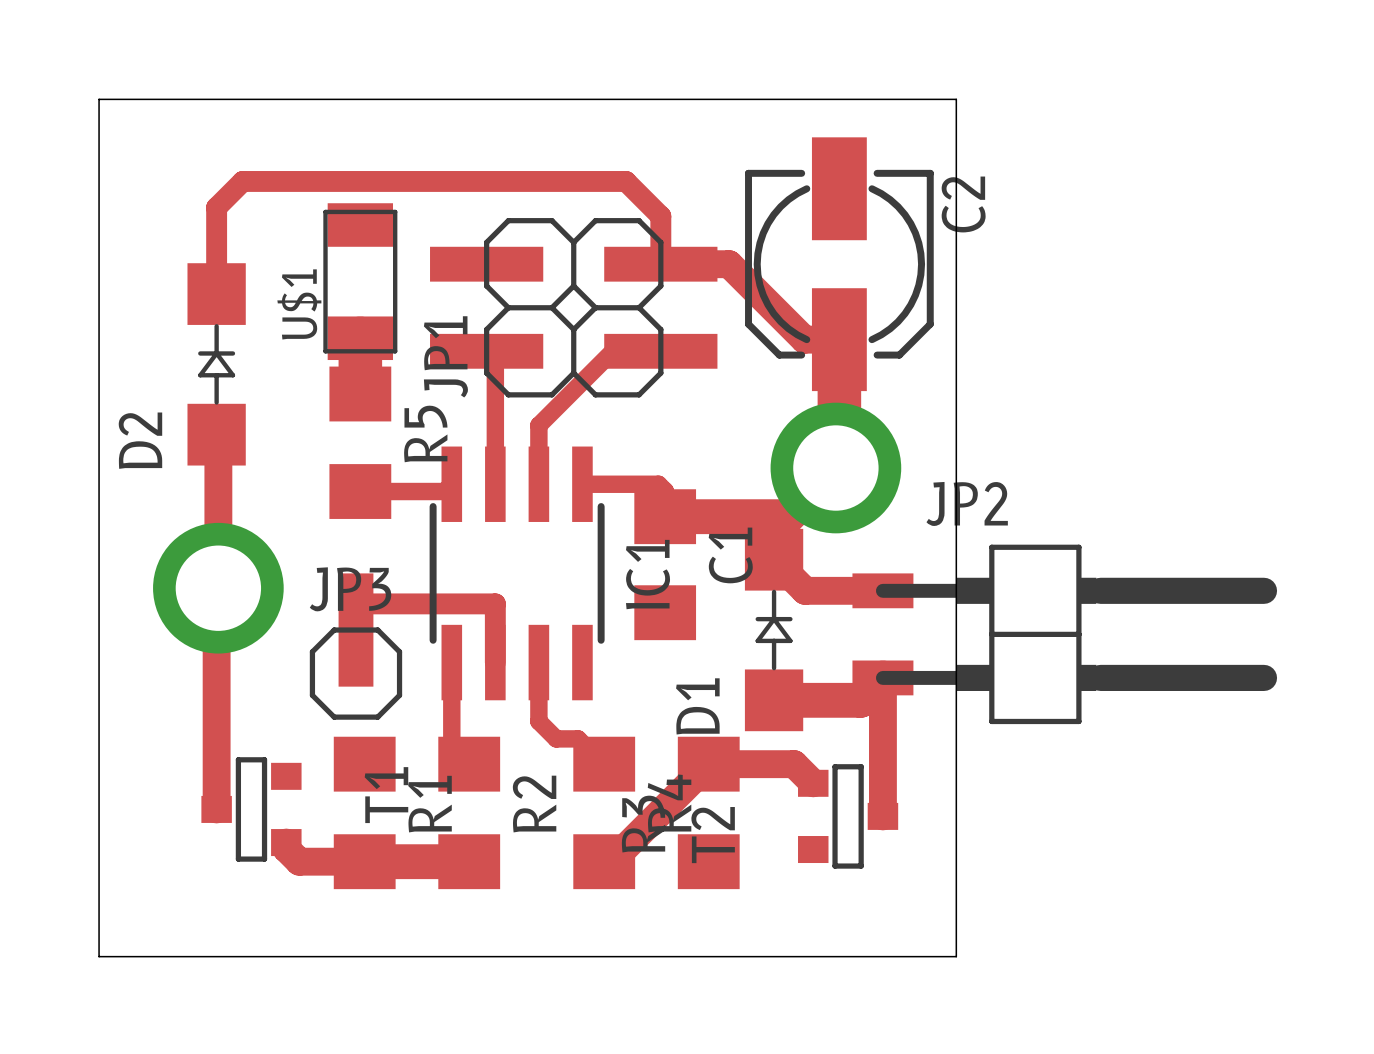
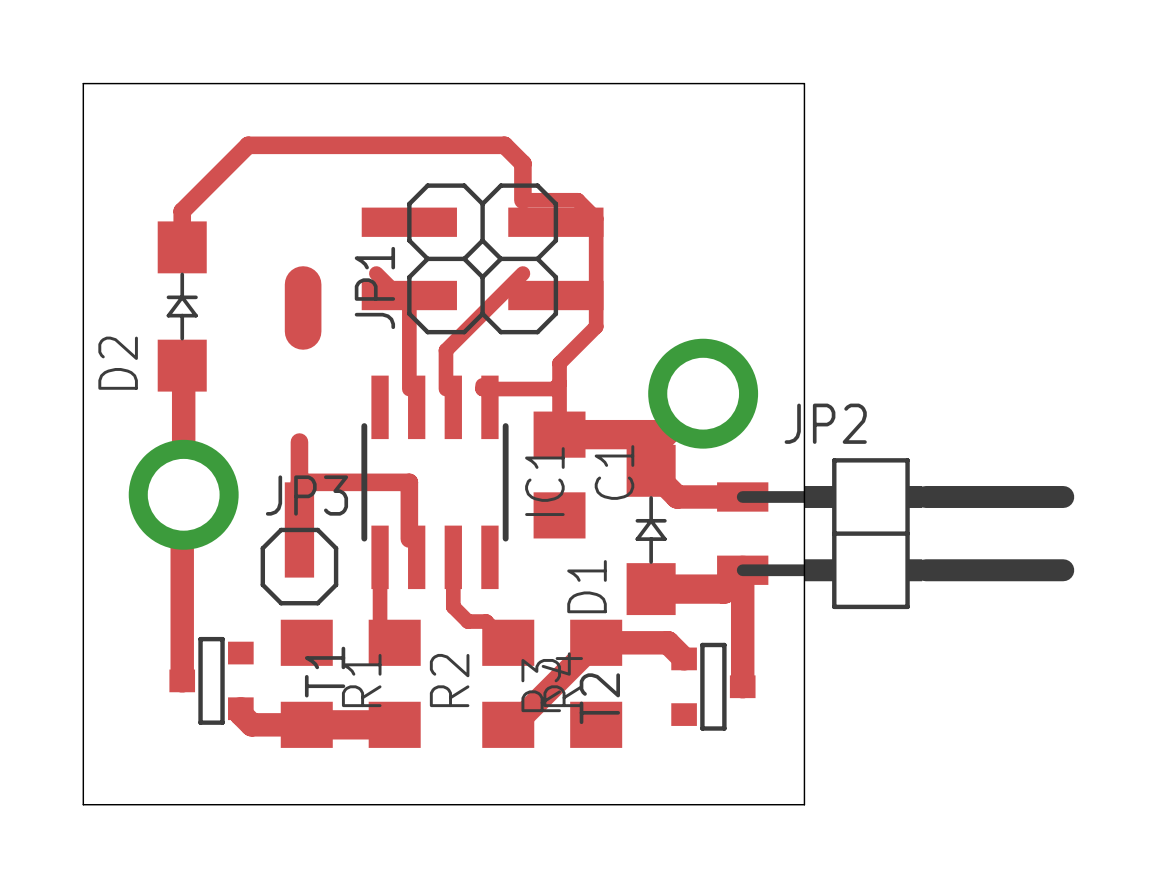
top track: (216, 251) (216, 207) (242, 181) (625, 181) (660, 216) (660, 264) (729, 264) (804, 339) (839, 339) (839, 464) (835, 468) -> (182, 211) (248, 145) (504, 145) (522, 163) (522, 200) (577, 200) (596, 218) (596, 326) (559, 363) (559, 412)
C2: (839, 264) -> none
U$1: (360, 281) -> none
top track: none -> (376, 273) (409, 306) (409, 389)
top track: none -> (522, 273) (445, 350) (445, 389)
top track: (486, 351) (495, 360) (495, 484) -> none
top track: (660, 351) (612, 351) (538, 425) (538, 484) -> none
R5: (360, 442) -> none
top track: none -> (559, 383) (553, 389) (482, 389) (482, 385)
top track: (582, 479) (582, 484) (658, 484) (665, 490) -> none
top track: (451, 484) (444, 491) (360, 491) -> none
top track: none -> (299, 442) (299, 482) (409, 482) (409, 539)
top track: (355, 630) (355, 603) (495, 603) (495, 662) -> none

